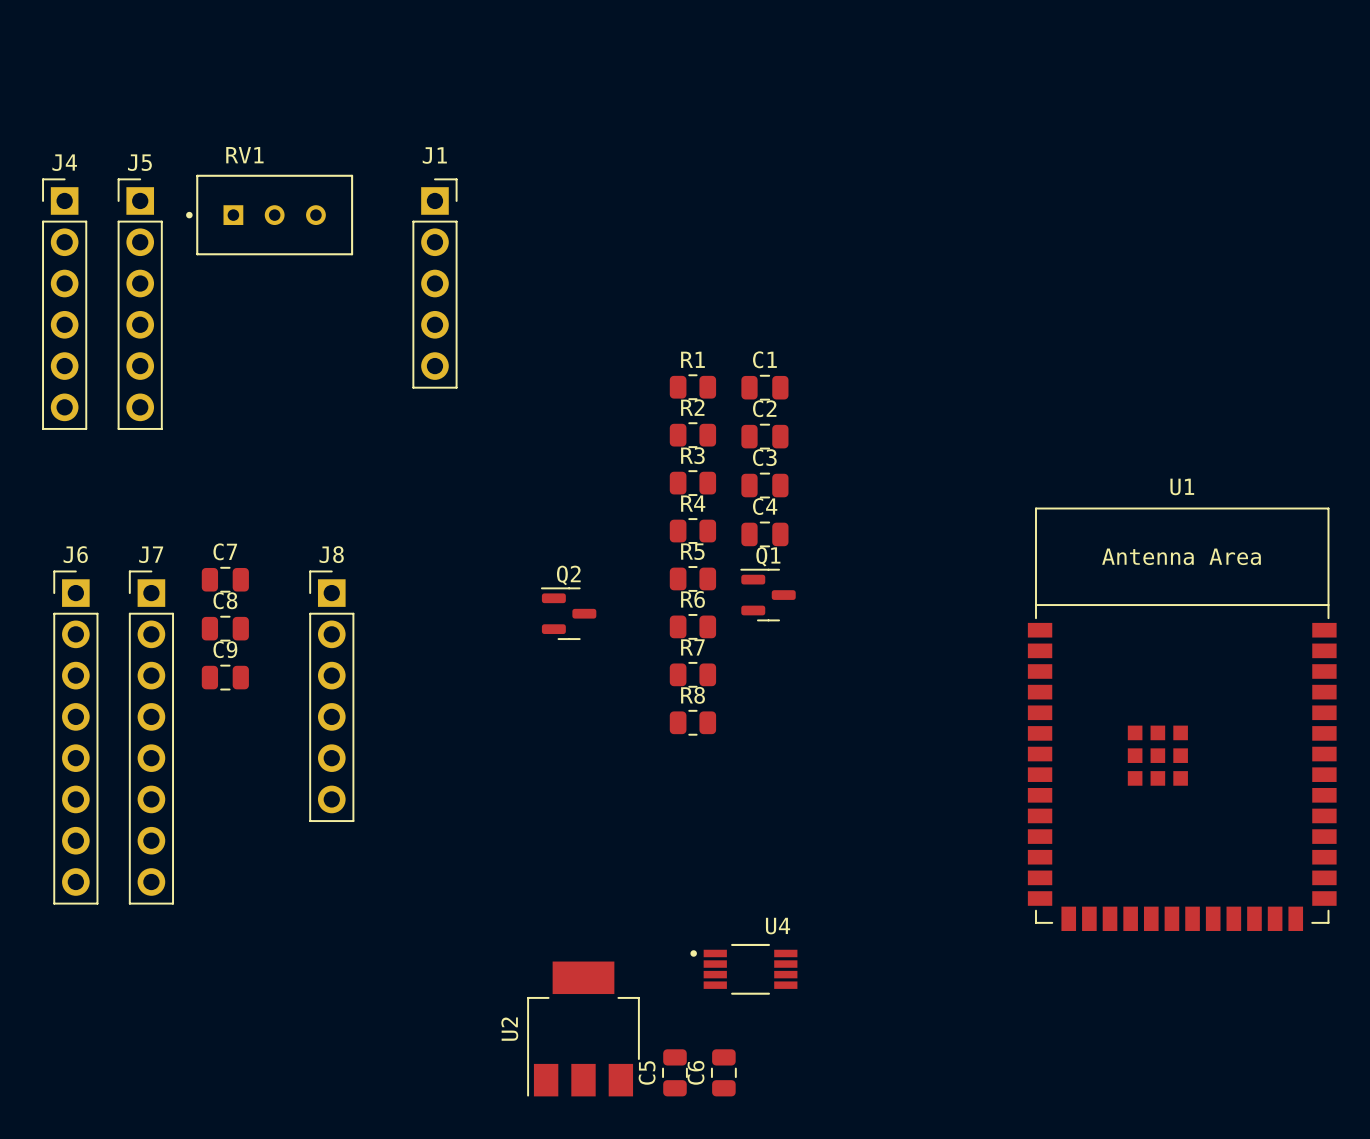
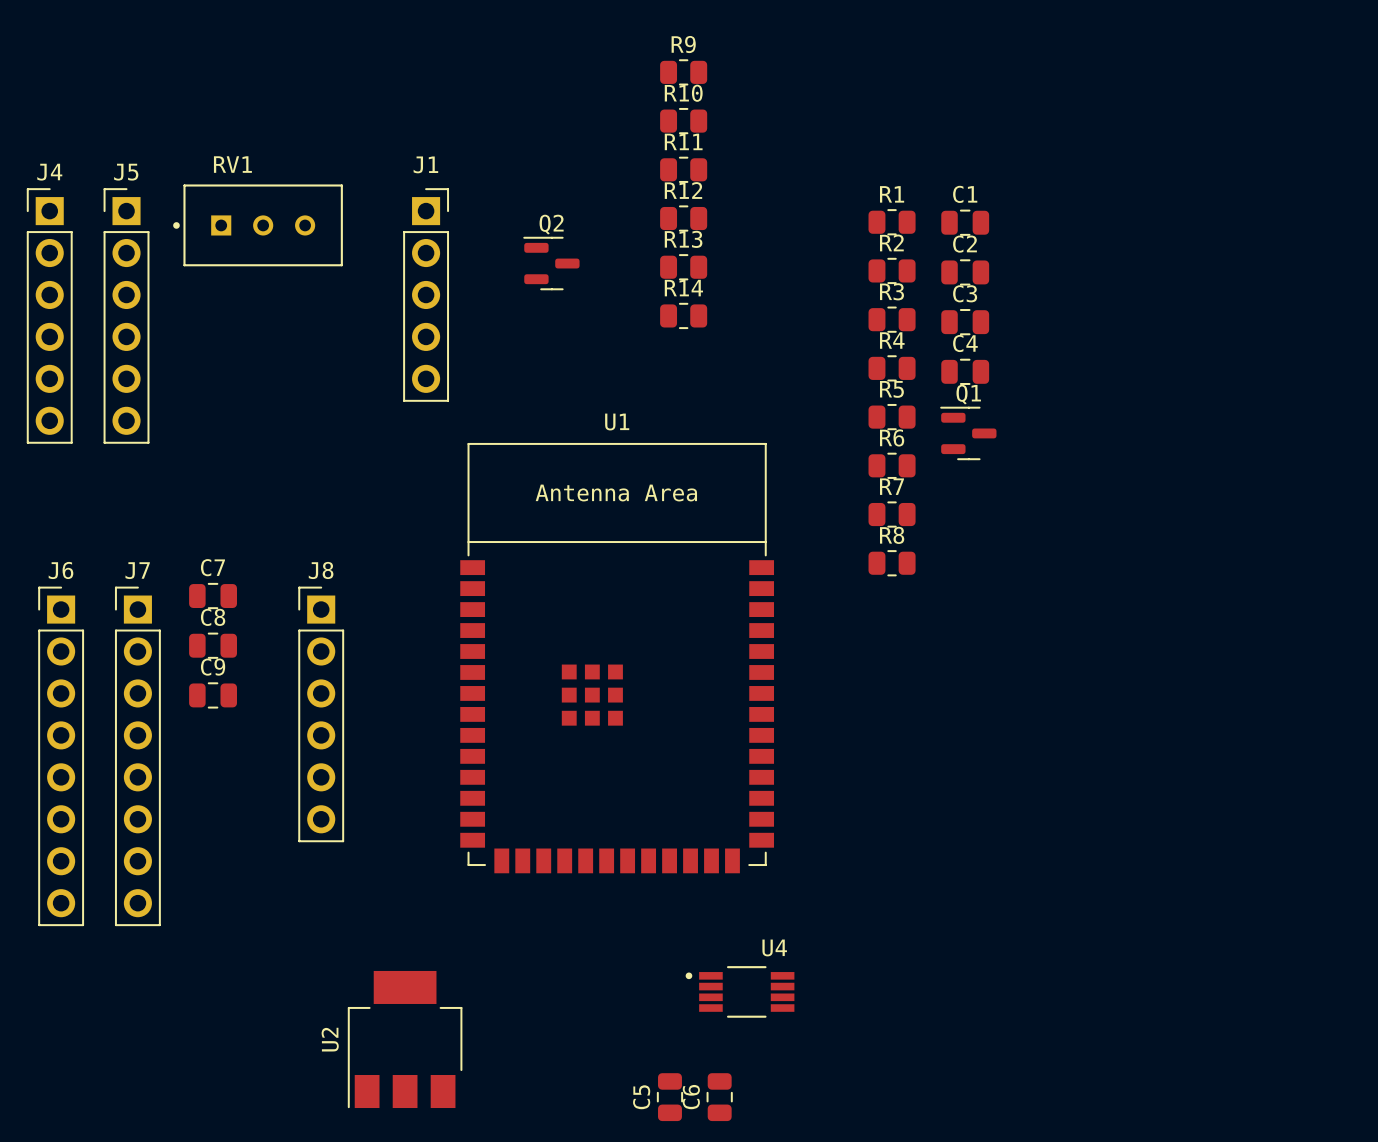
R9: none -> (683, 72)
R10: none -> (683, 121)
R11: none -> (683, 169)
R12: none -> (683, 218)
R13: none -> (683, 267)
R14: none -> (683, 315)
R1 position: (692, 387) -> (892, 222)
C1 position: (764, 387) -> (965, 222)
R2 position: (692, 435) -> (892, 270)
C2 position: (764, 436) -> (965, 272)
R3 position: (692, 483) -> (892, 319)
C3 position: (764, 485) -> (965, 322)
R4 position: (692, 531) -> (892, 368)
C4 position: (764, 534) -> (965, 371)
R5 position: (692, 578) -> (892, 417)
Q1 position: (768, 595) -> (968, 433)
Q2 position: (568, 613) -> (551, 263)
R6 position: (692, 626) -> (892, 465)
R7 position: (692, 674) -> (892, 514)
U1 position: (1182, 719) -> (617, 658)
R8 position: (692, 722) -> (892, 563)
U2 position: (583, 1029) -> (405, 1039)

